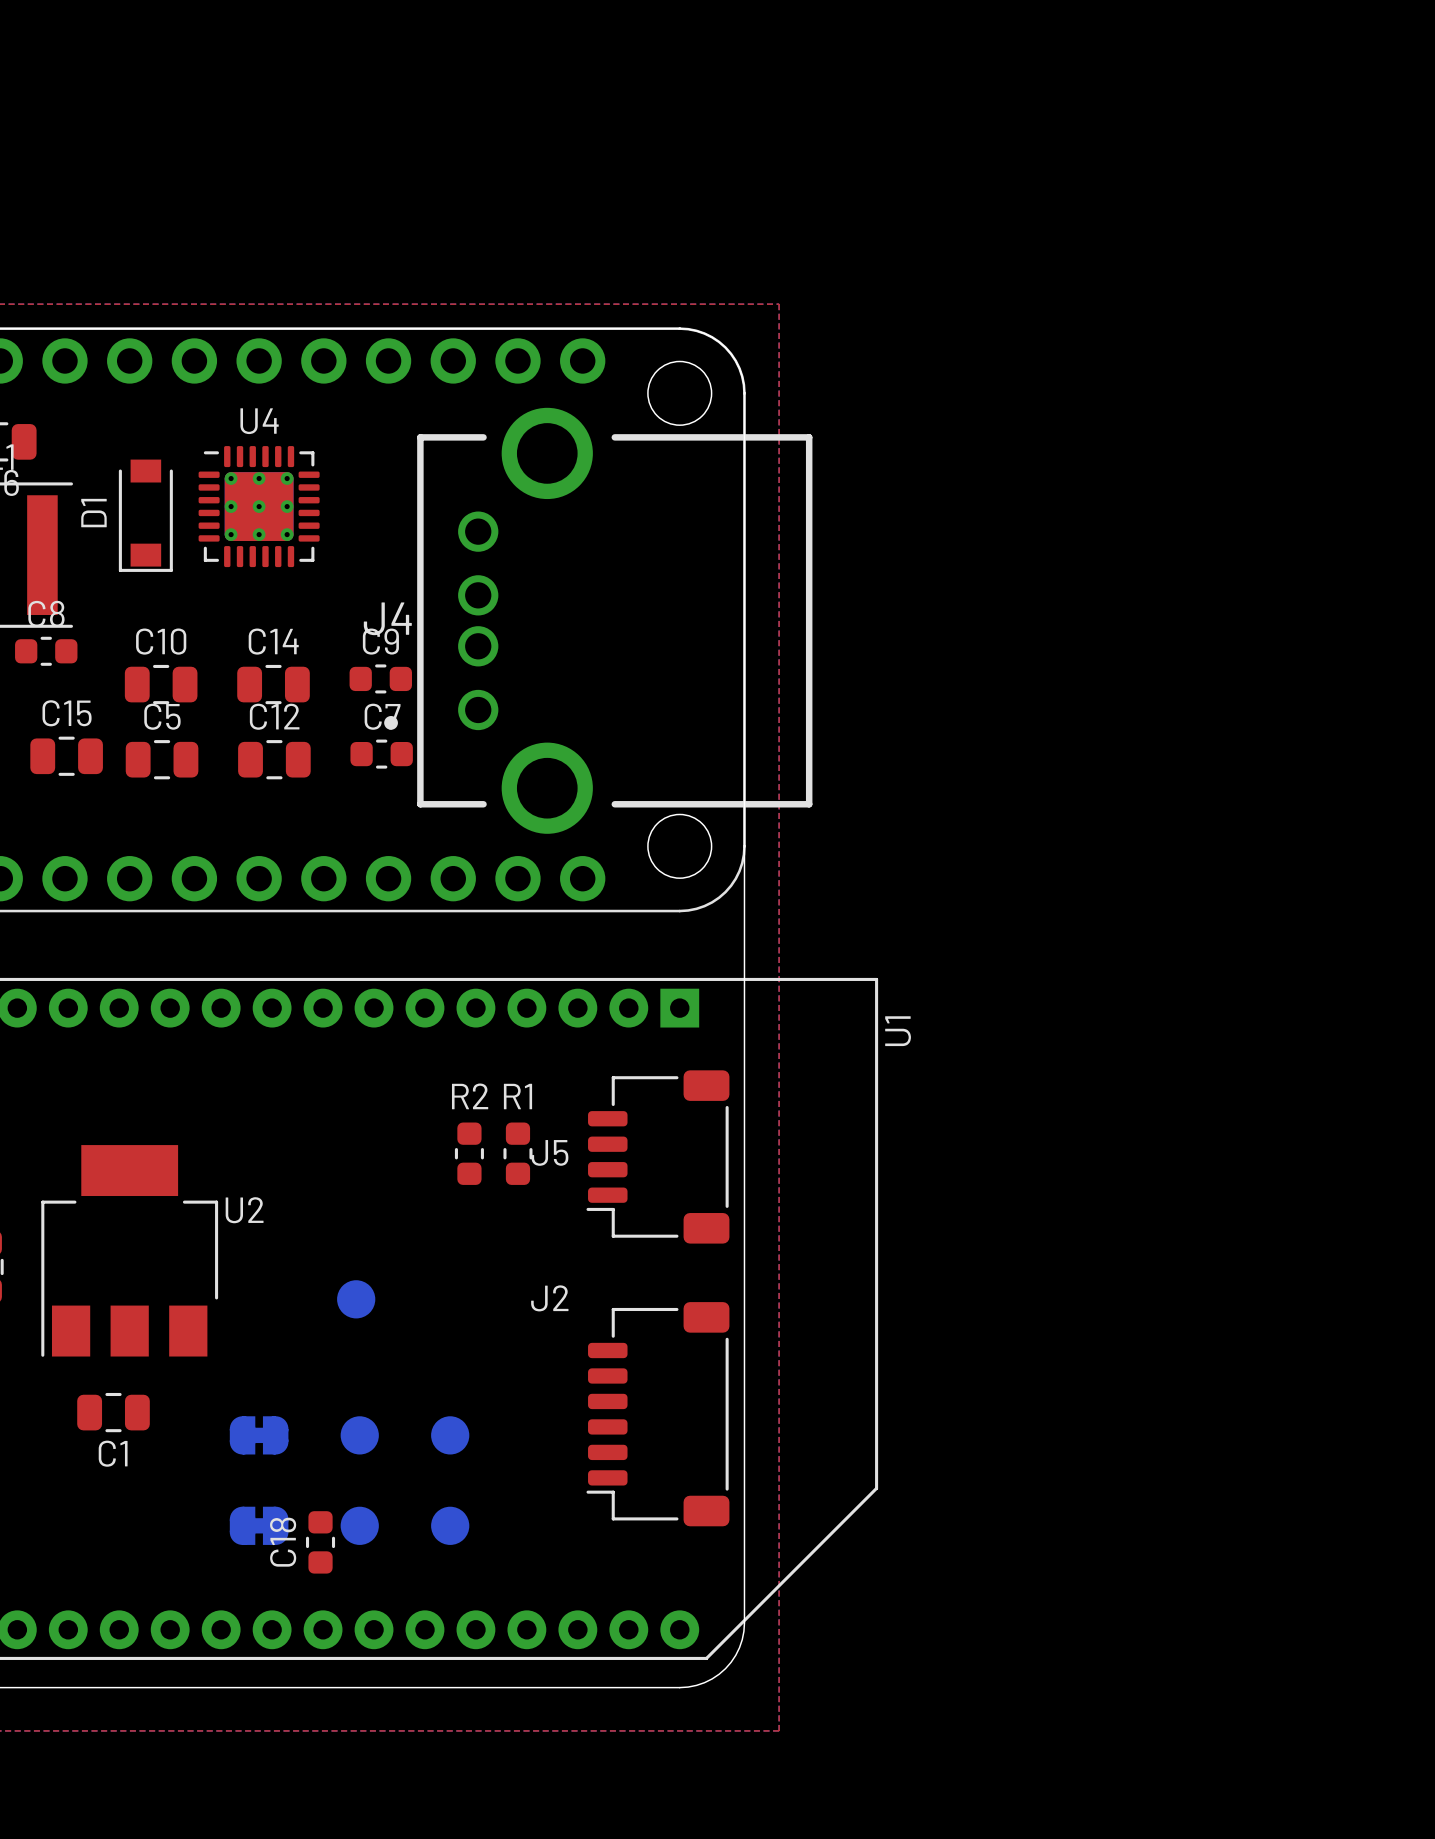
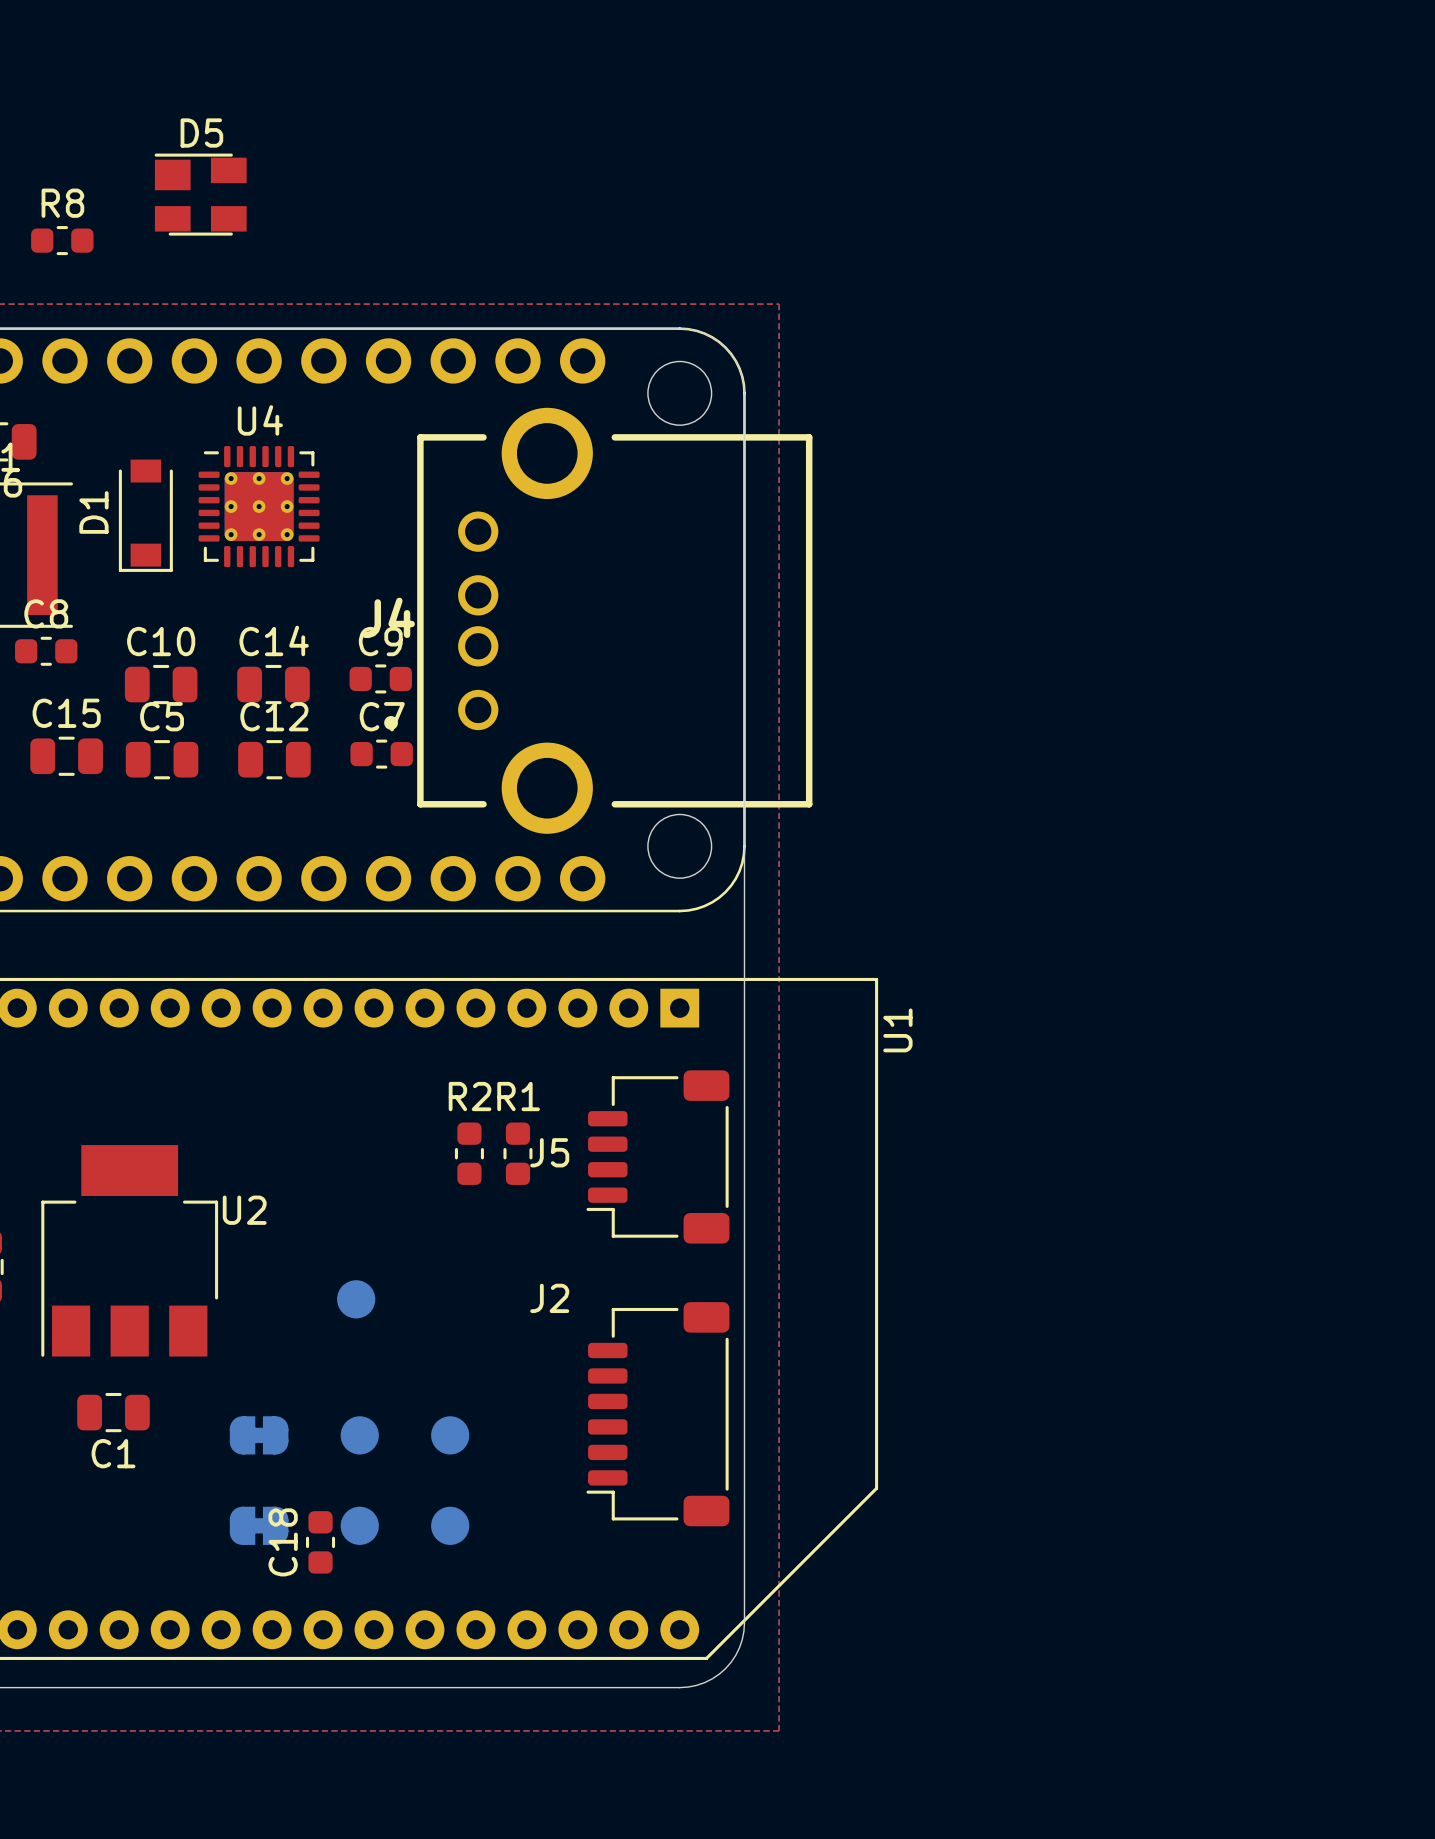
D5: none -> (200, 194)
R8: none -> (62, 240)

